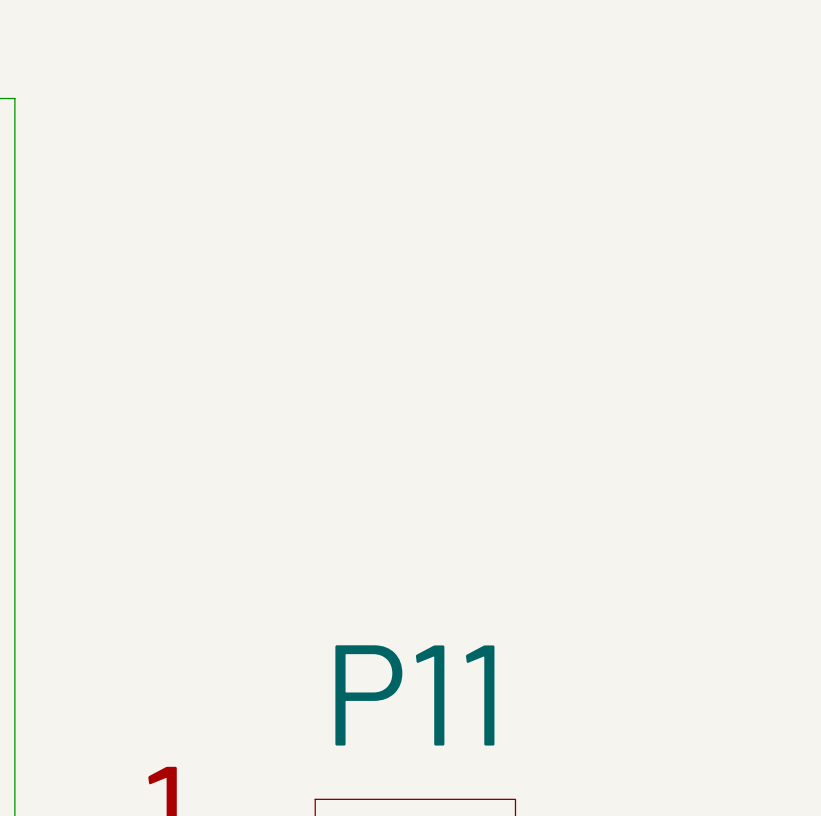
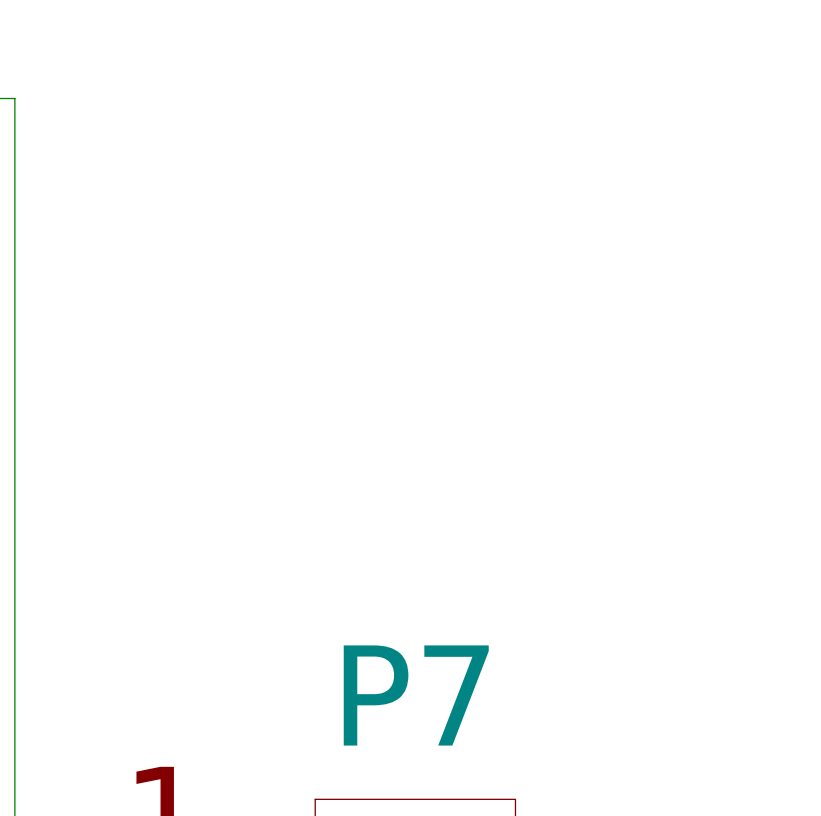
P11 name: P11 (414, 695) -> P7 (416, 695)

